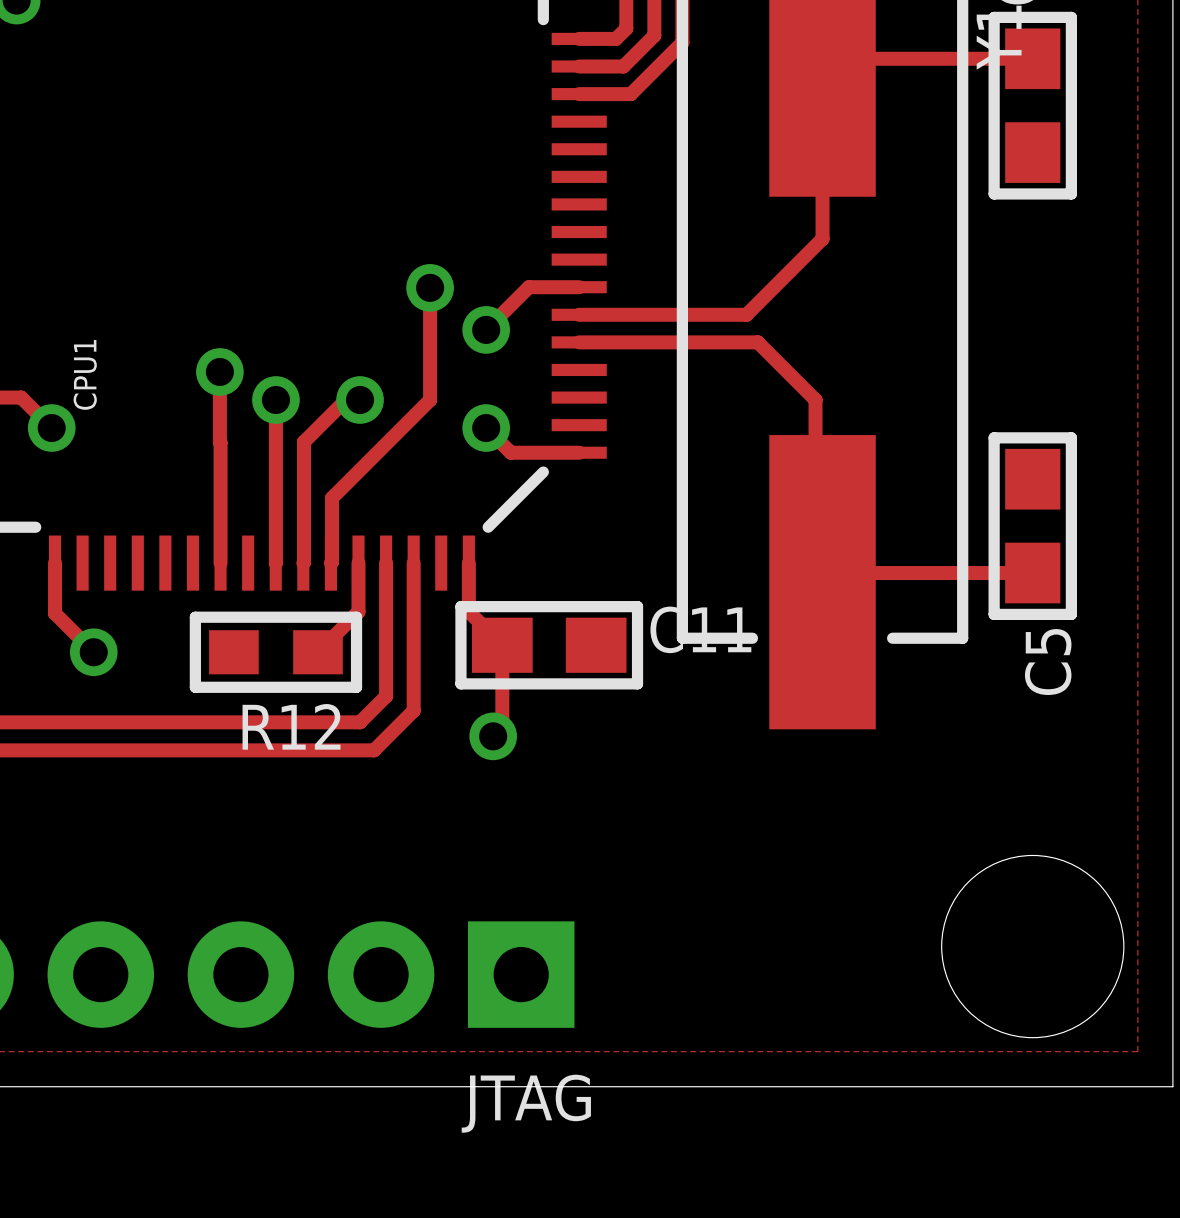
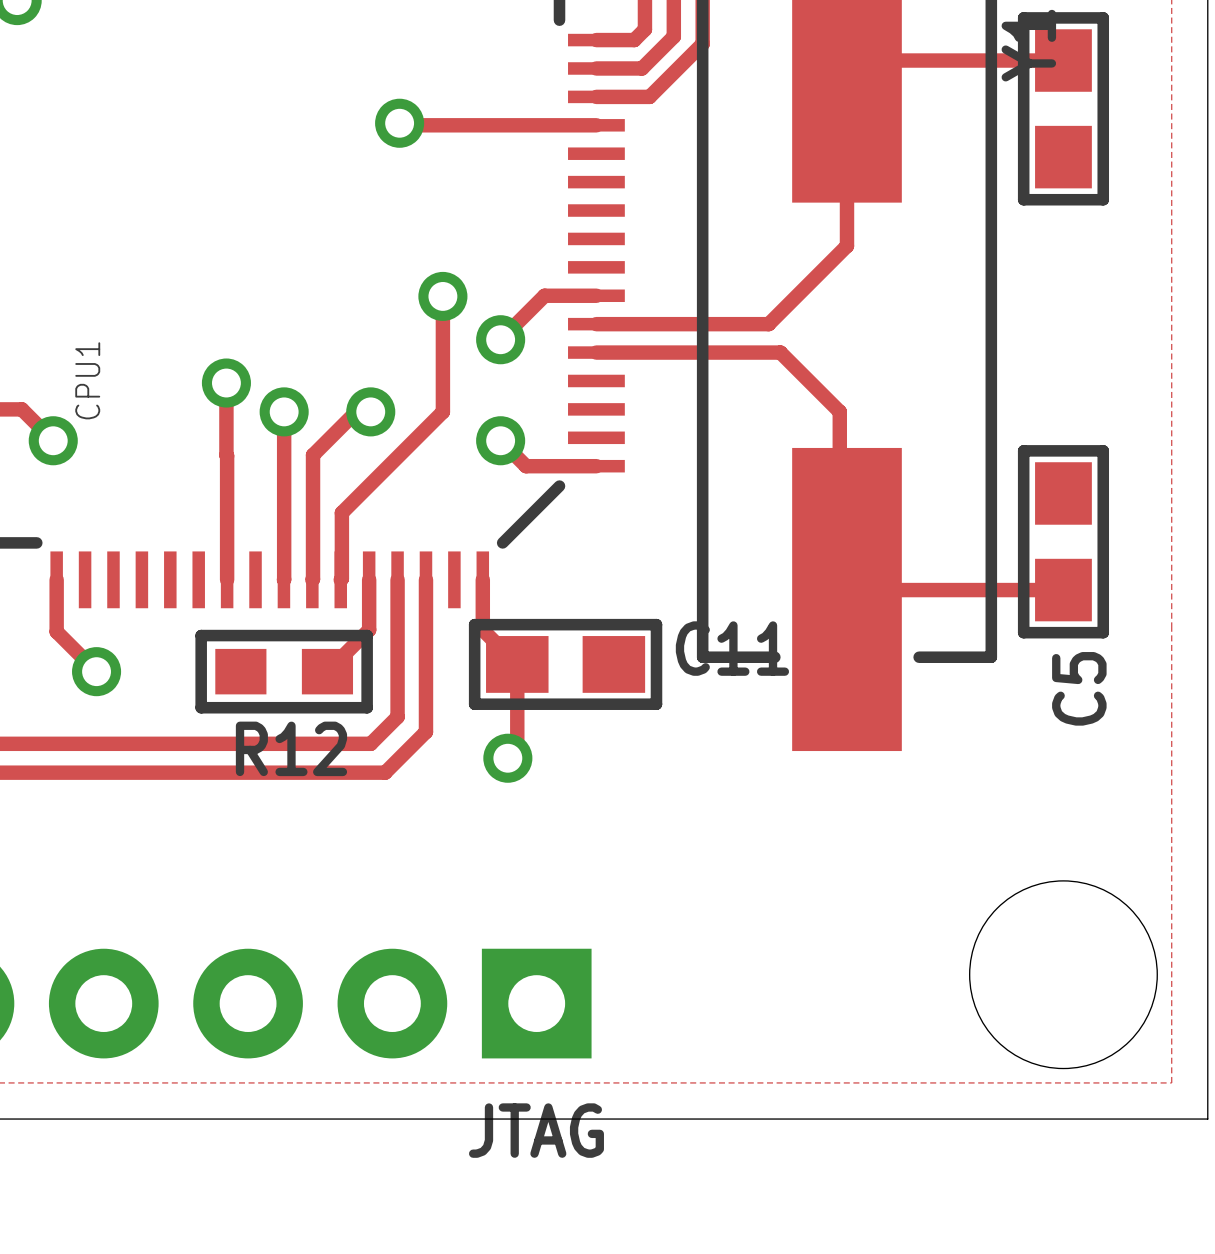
track: none -> (399, 123) (401, 125) (596, 125)
via: none -> (399, 123)

